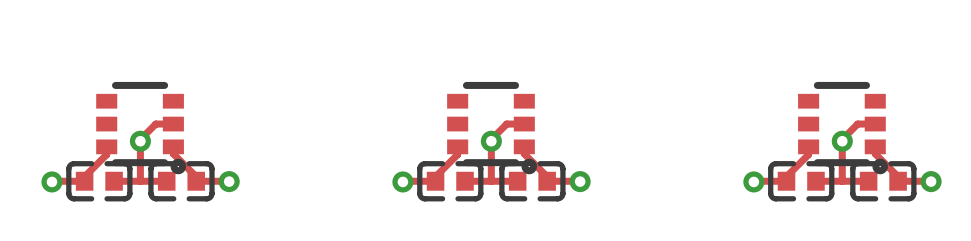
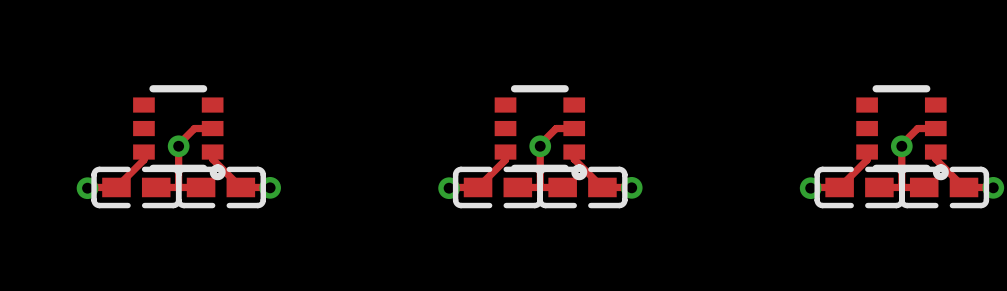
part footprint: [66, 161, 133, 202] -> [91, 166, 182, 209]
part footprint: [148, 161, 215, 202] -> [175, 166, 266, 209]
part footprint: [417, 161, 484, 202] -> [452, 166, 543, 209]
part footprint: [499, 161, 566, 202] -> [537, 166, 628, 209]
part footprint: [768, 161, 835, 202] -> [814, 166, 905, 209]
part footprint: [850, 161, 917, 202] -> [899, 166, 990, 209]

